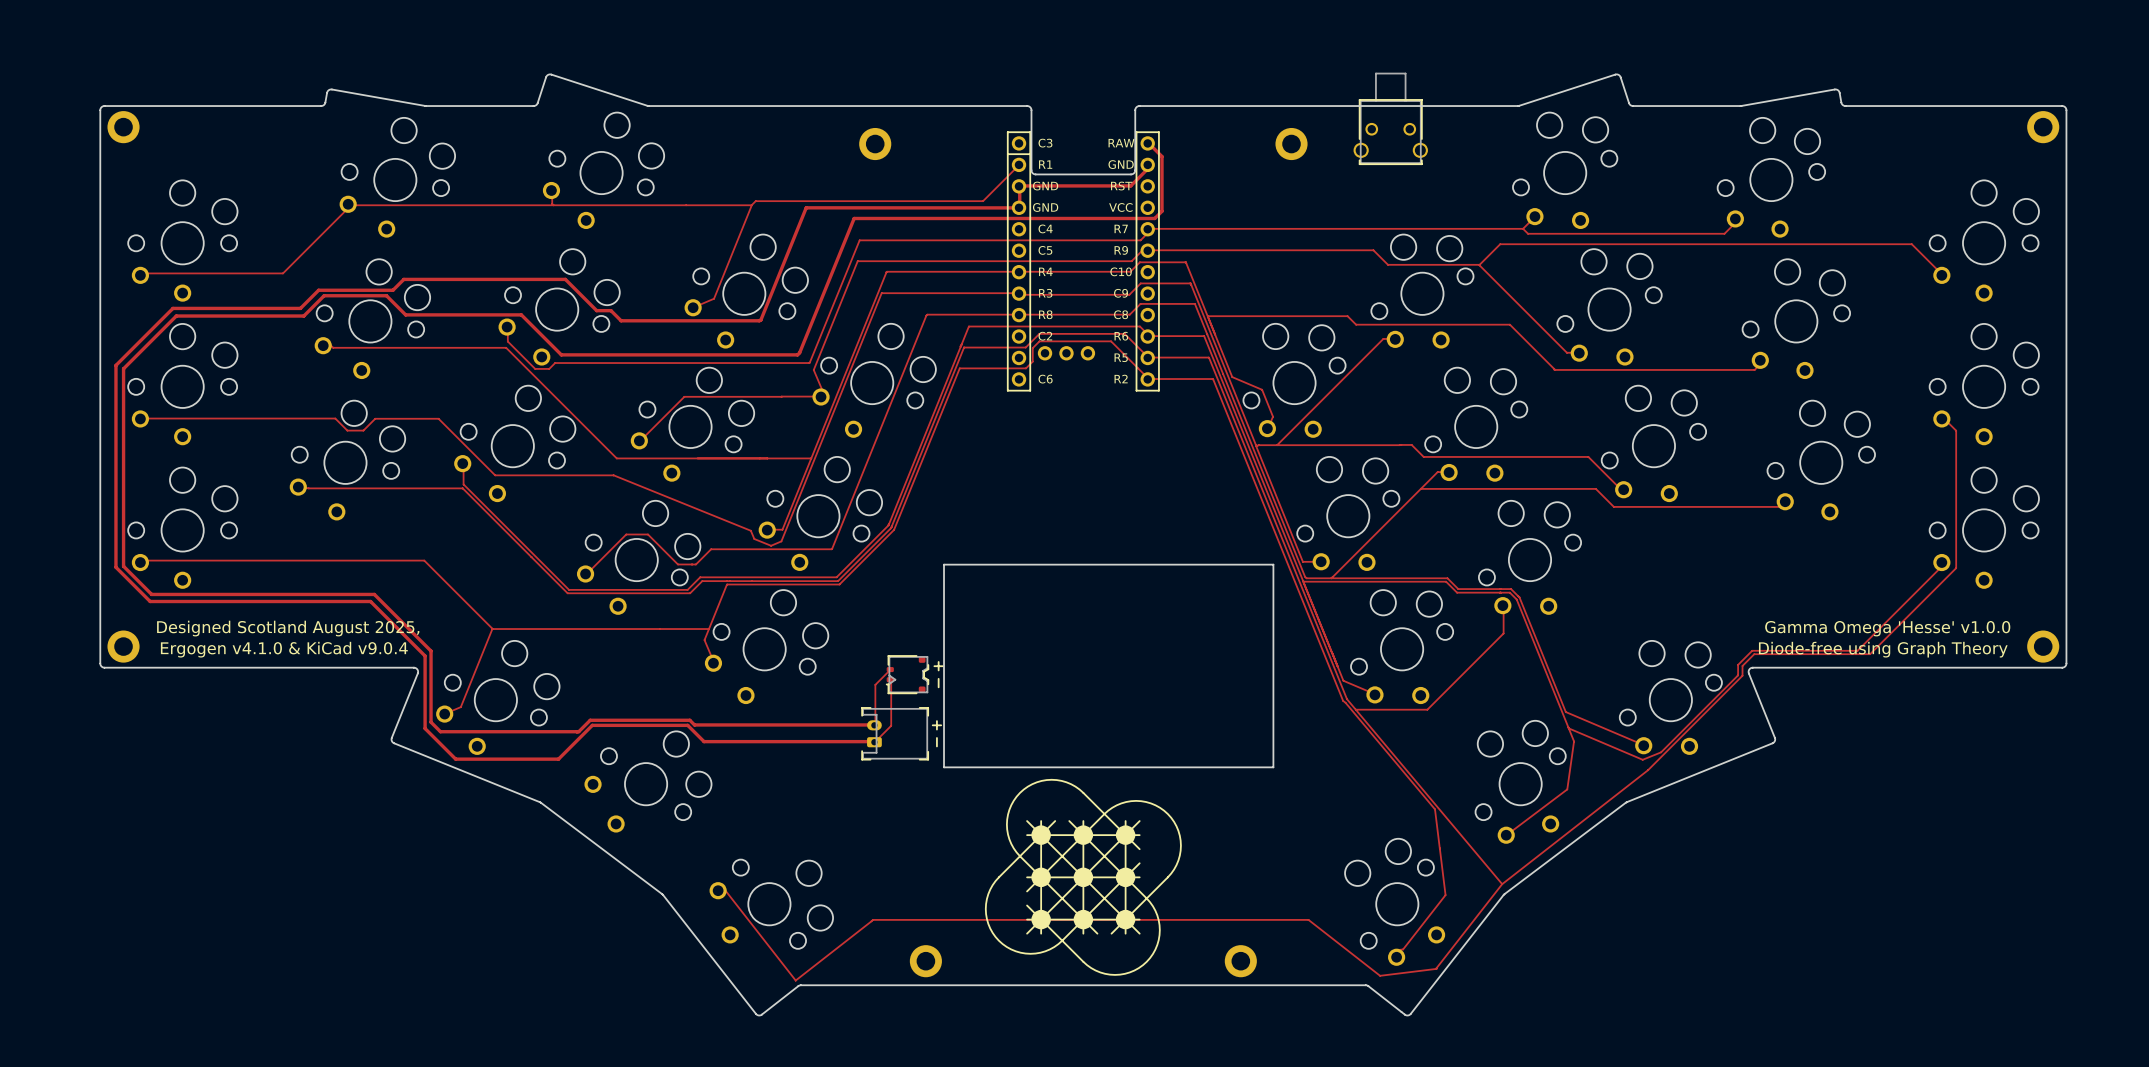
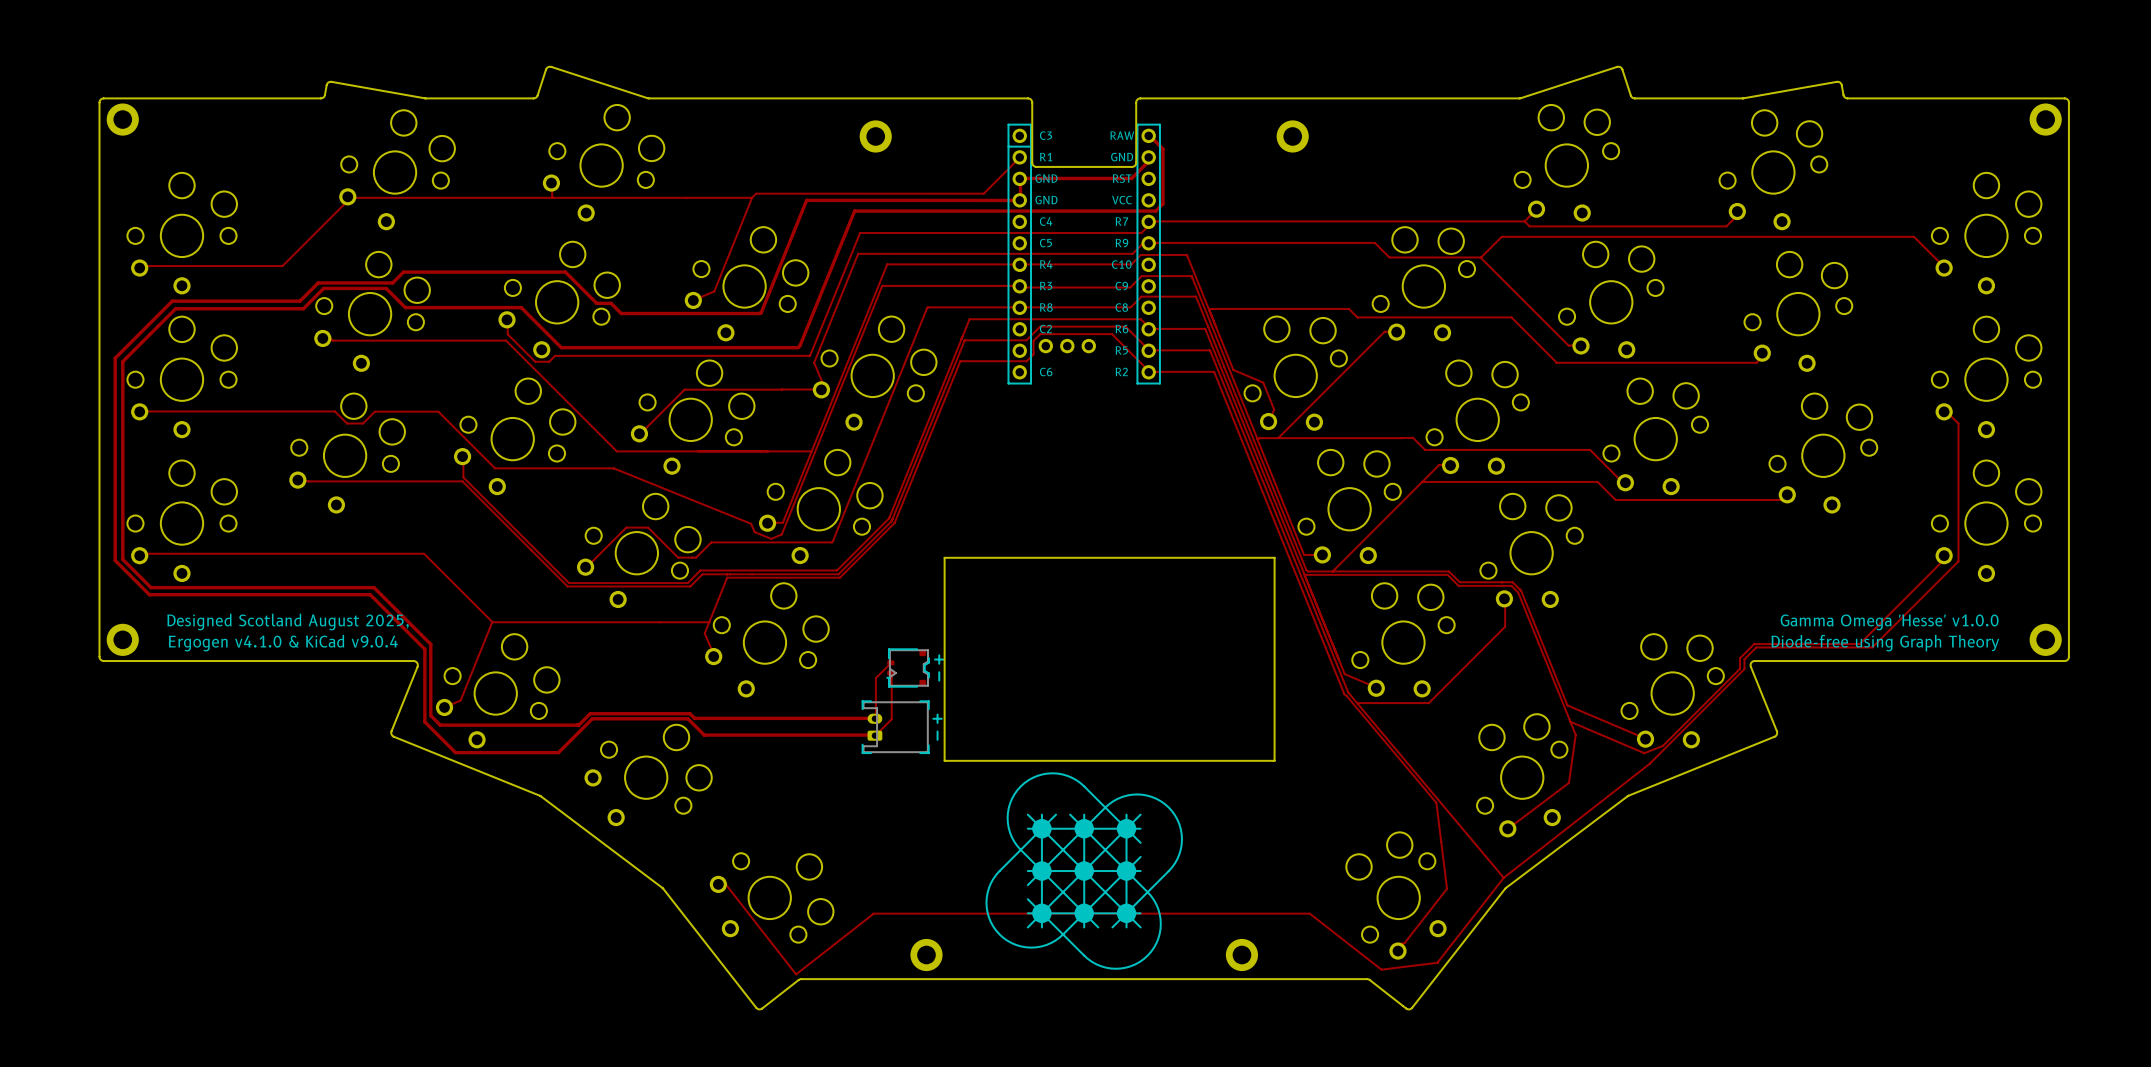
part: (1390, 119) -> none

